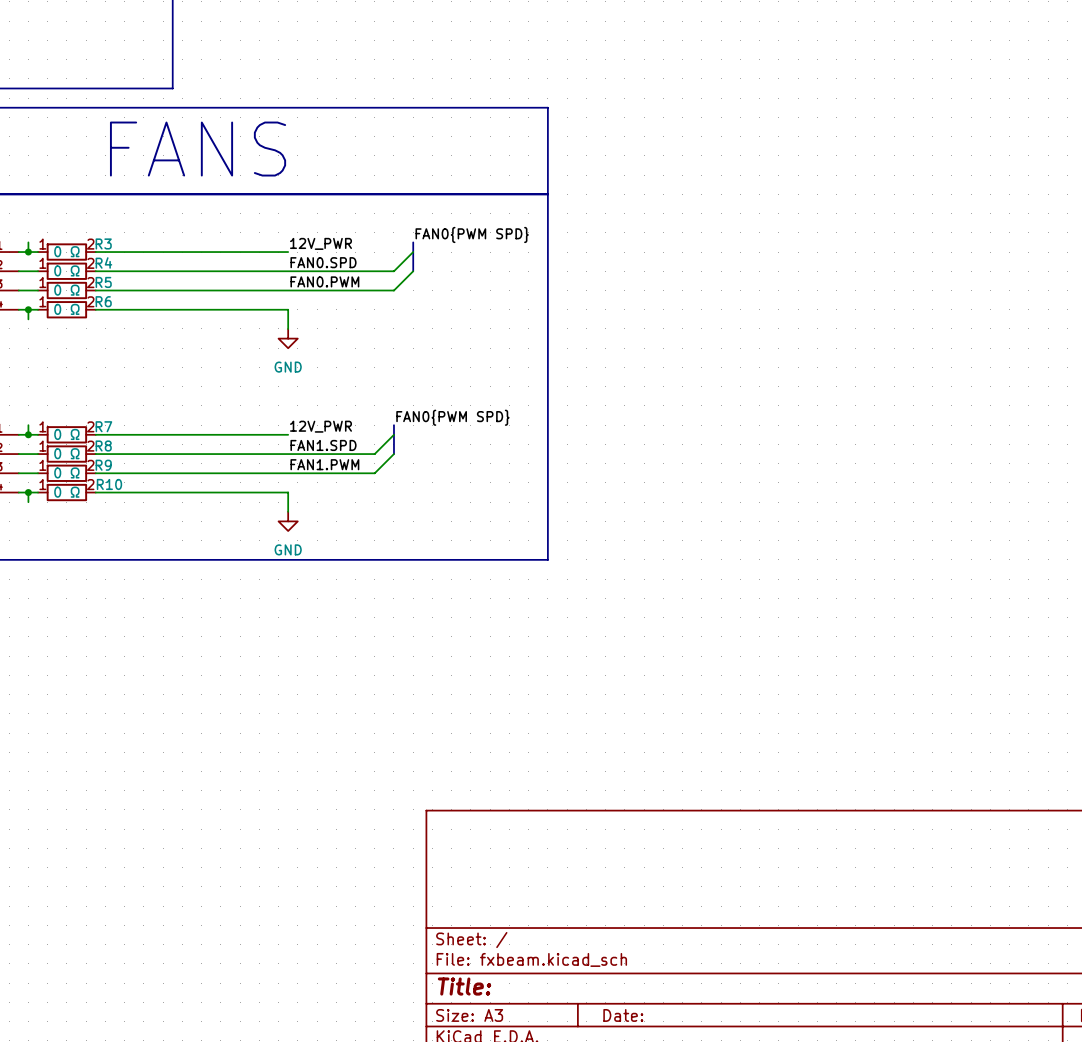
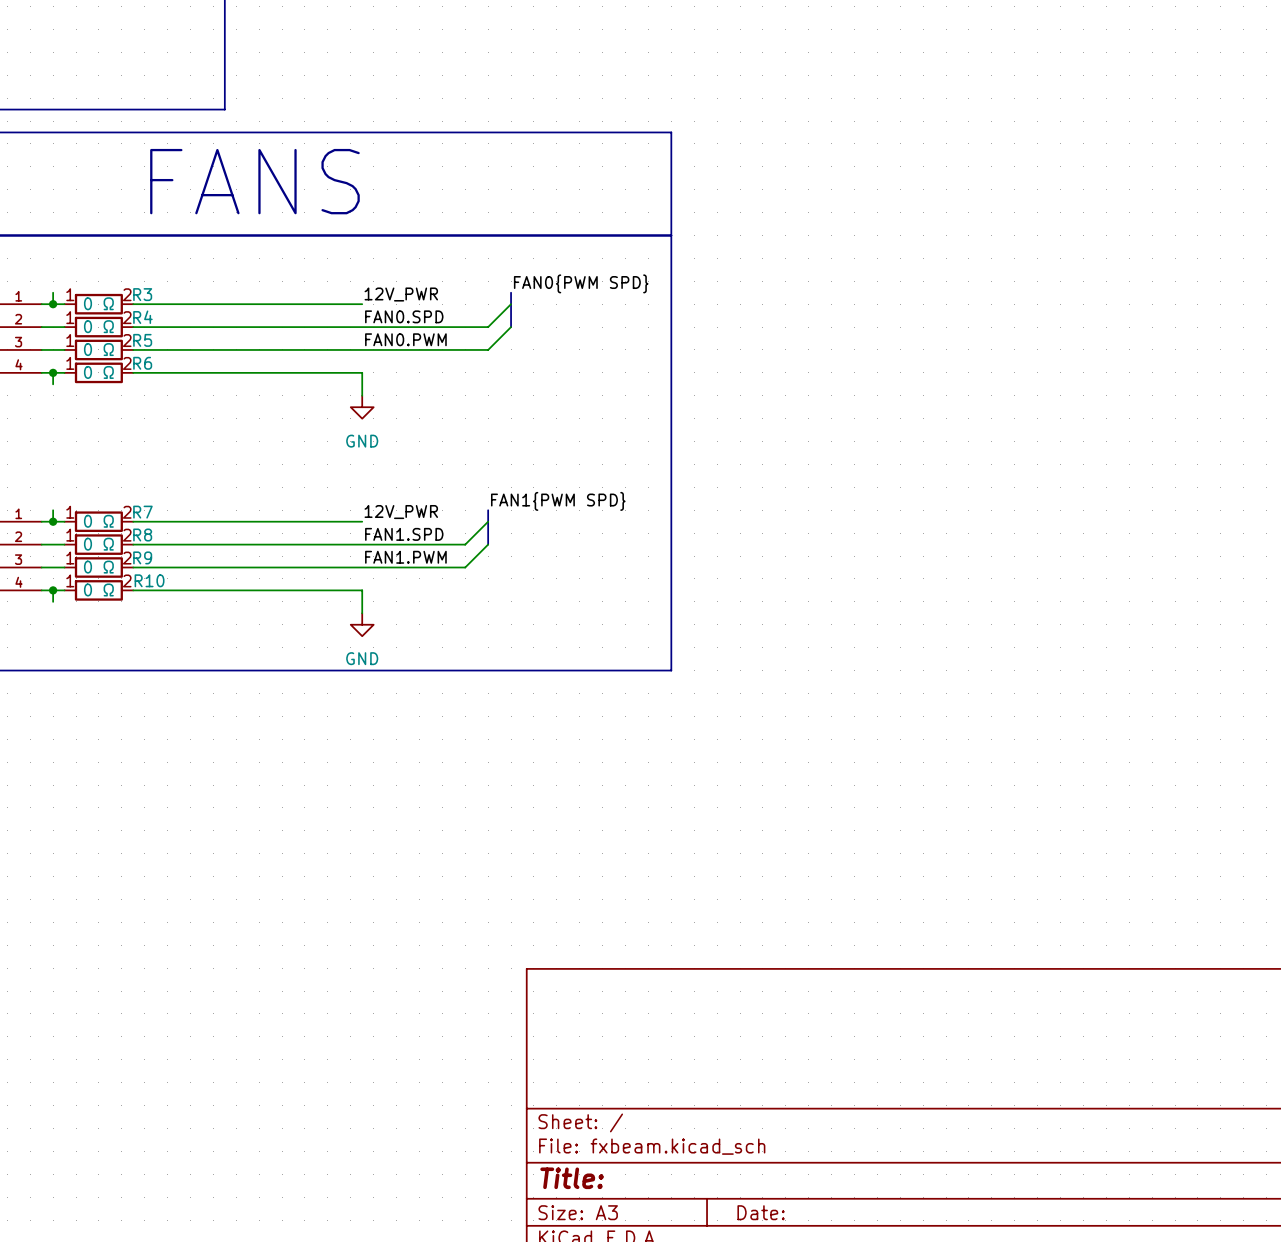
label: FAN0{PWM SPD} (452, 417) -> FAN1{PWM SPD} (558, 501)

